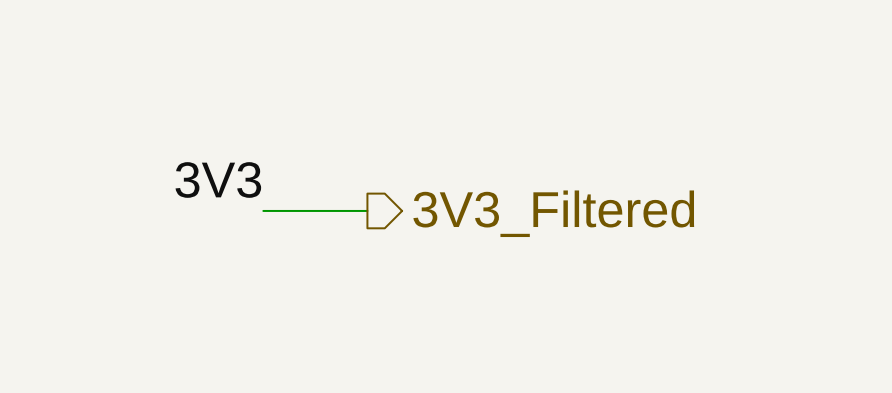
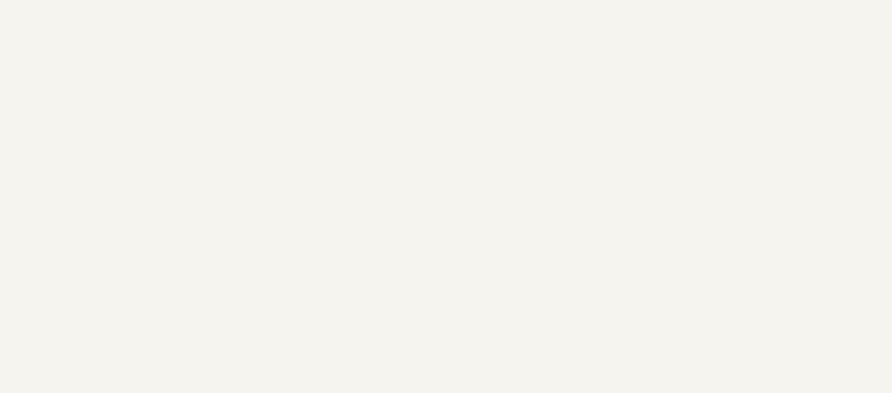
label: 3V3 (218, 179) -> none
wire: (263, 210) (367, 210) -> none
hierarchical label: 3V3_Filtered (553, 213) -> none

